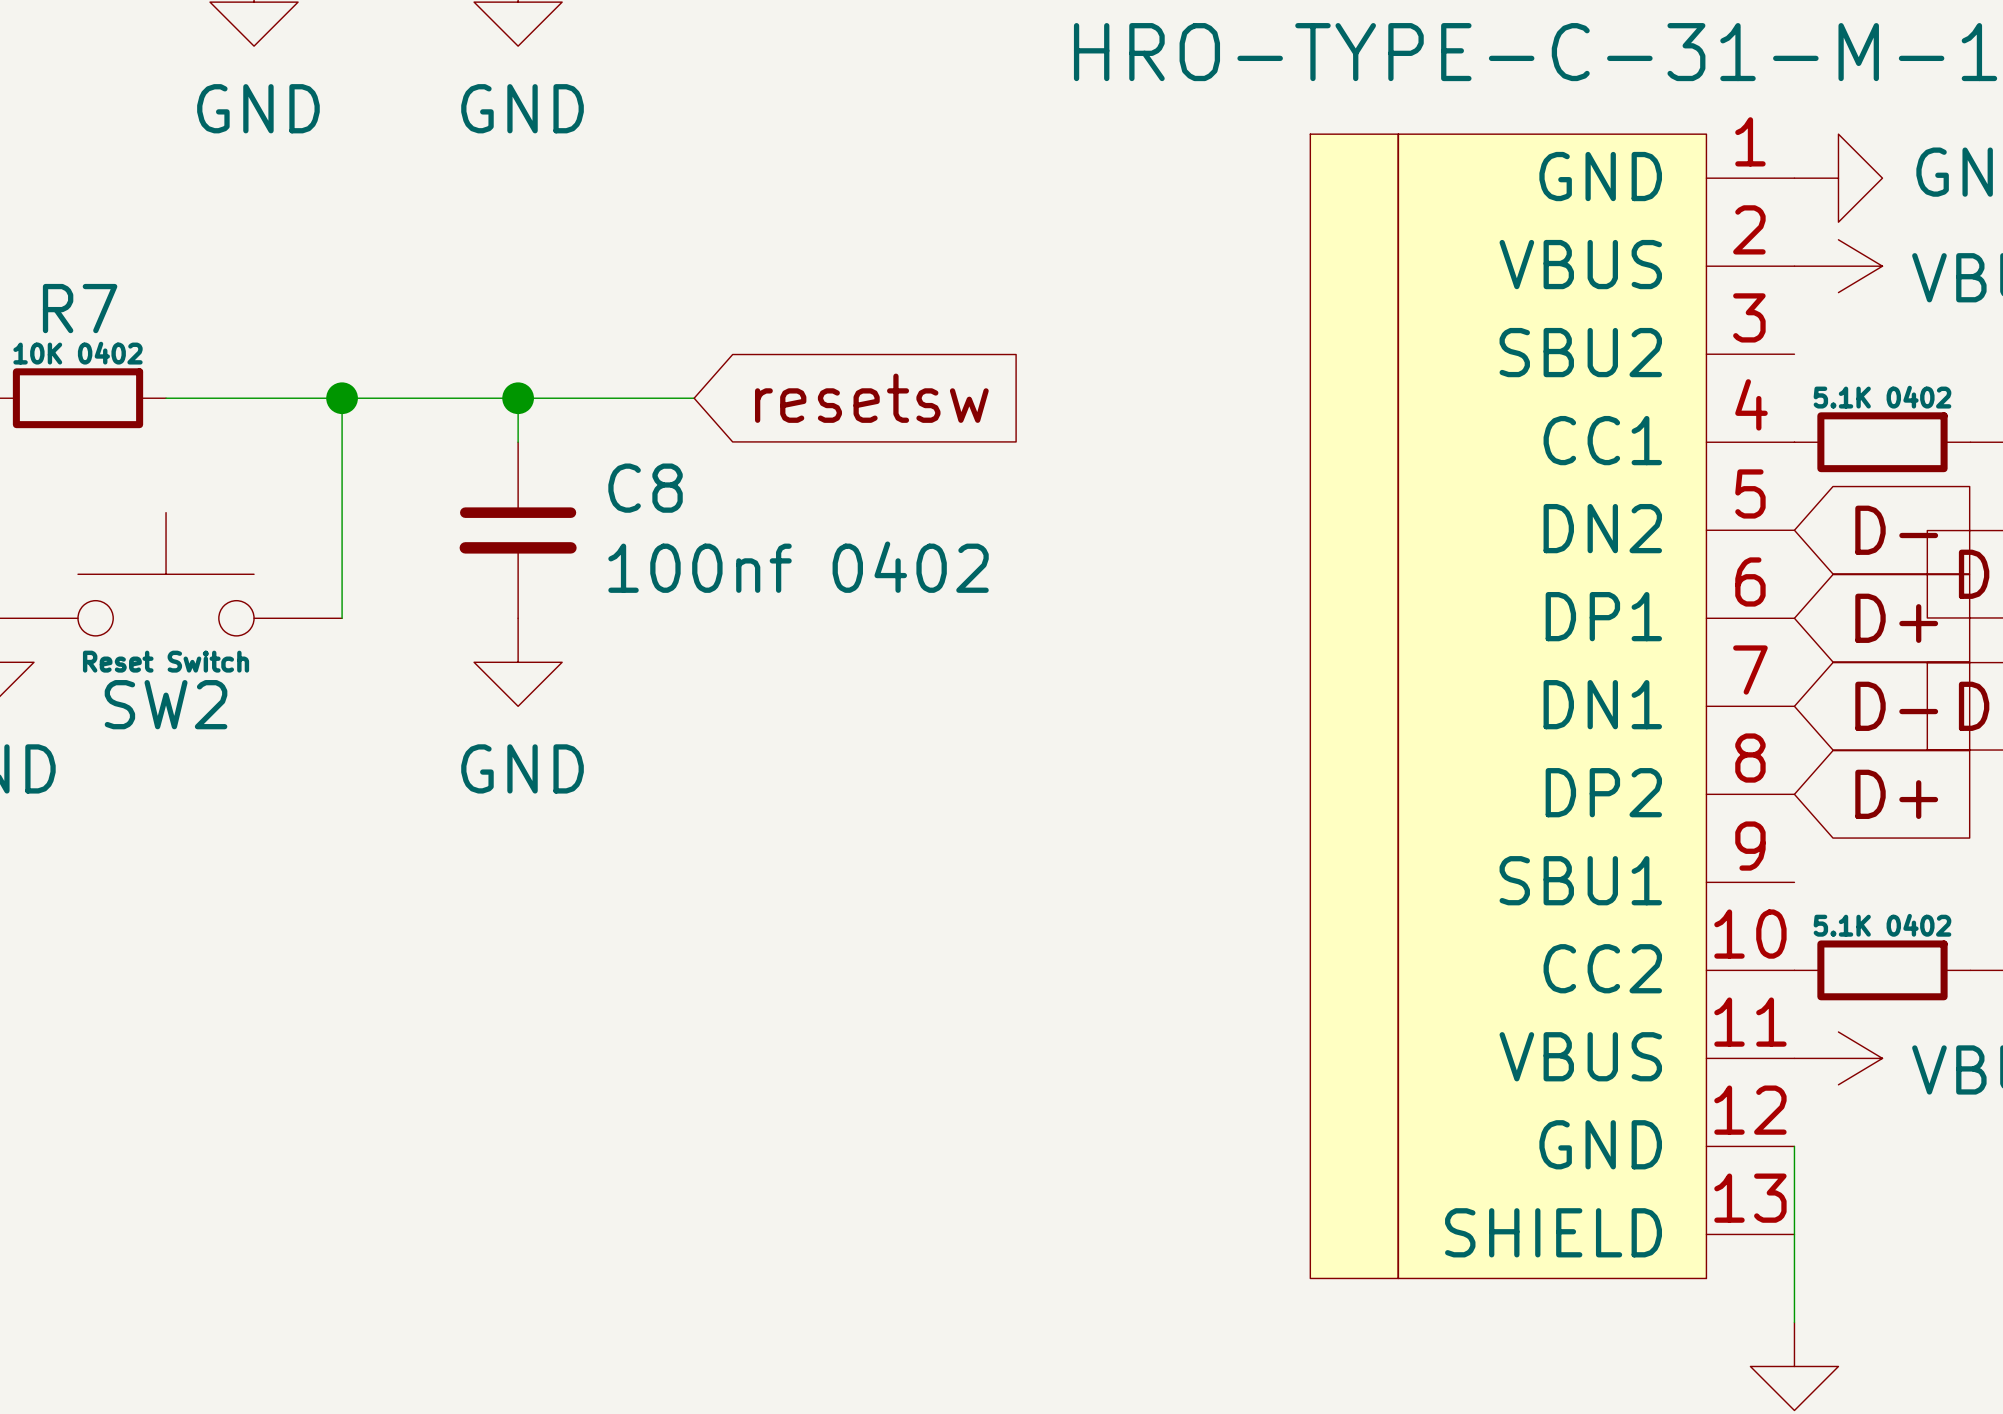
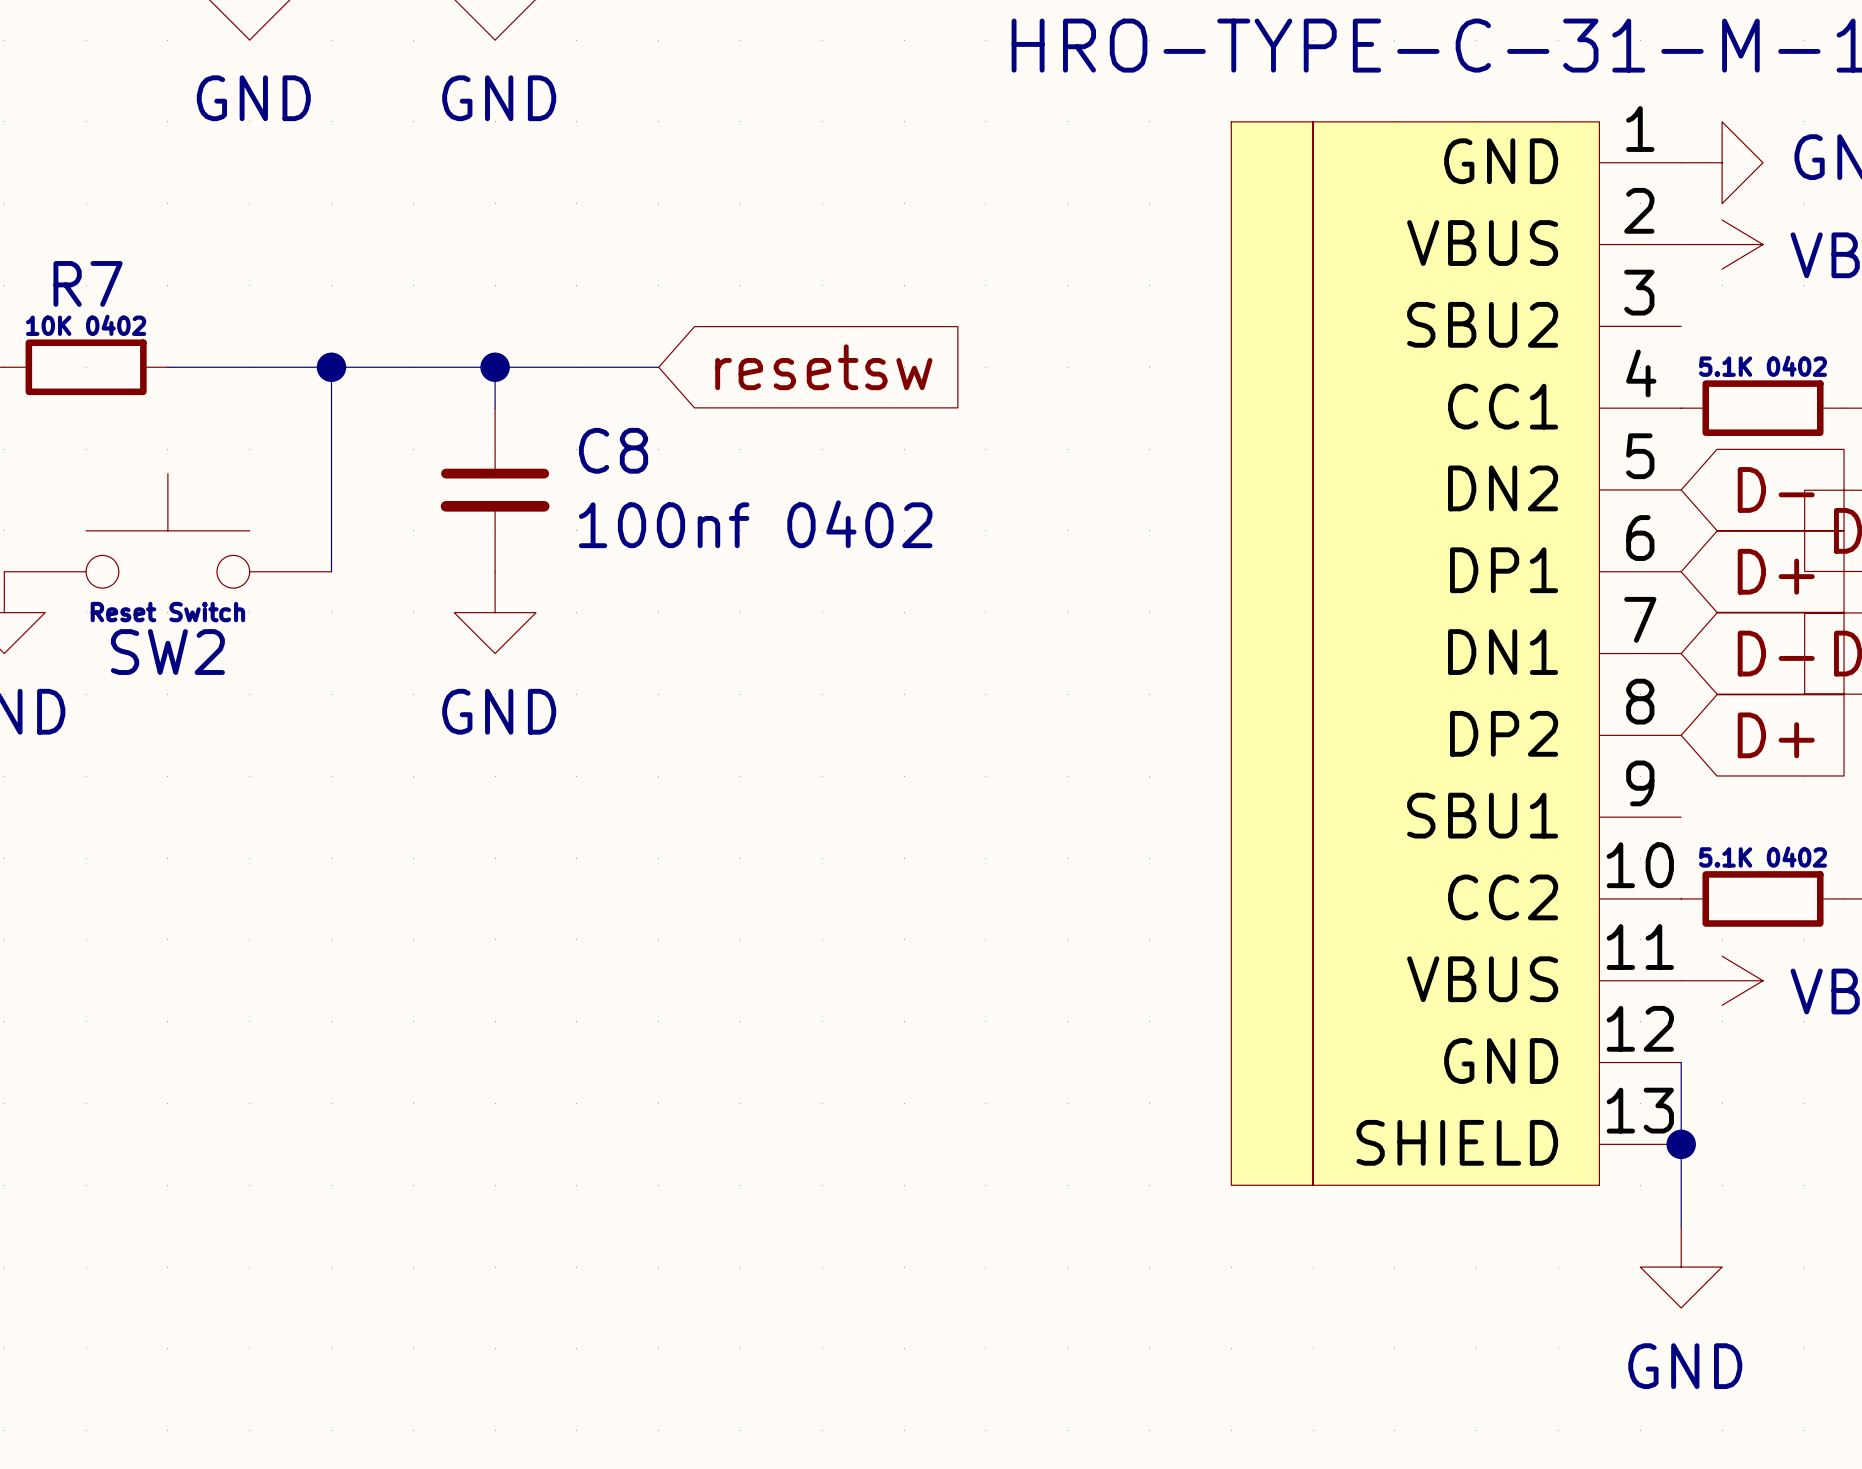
junction: none -> (1681, 1144)

